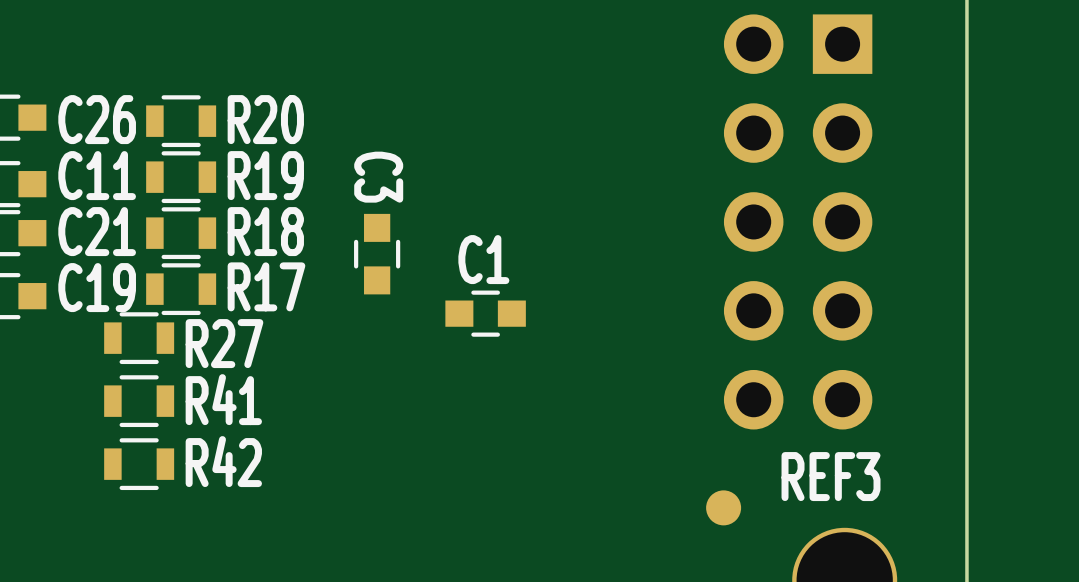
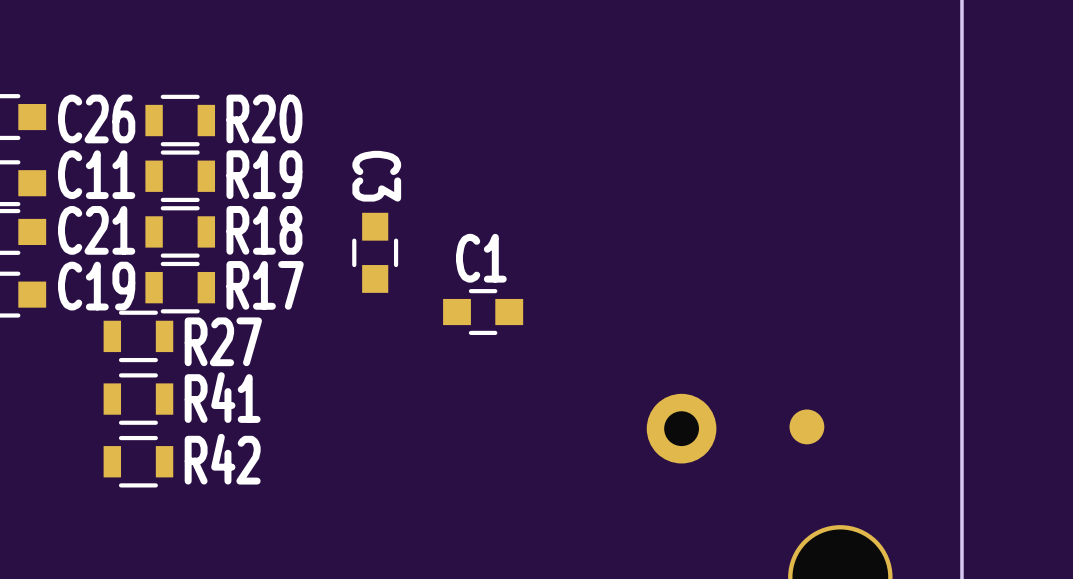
part: (798, 221) -> none
part: none -> (806, 426)
part: none -> (681, 428)
REF3: (723, 507) -> none

